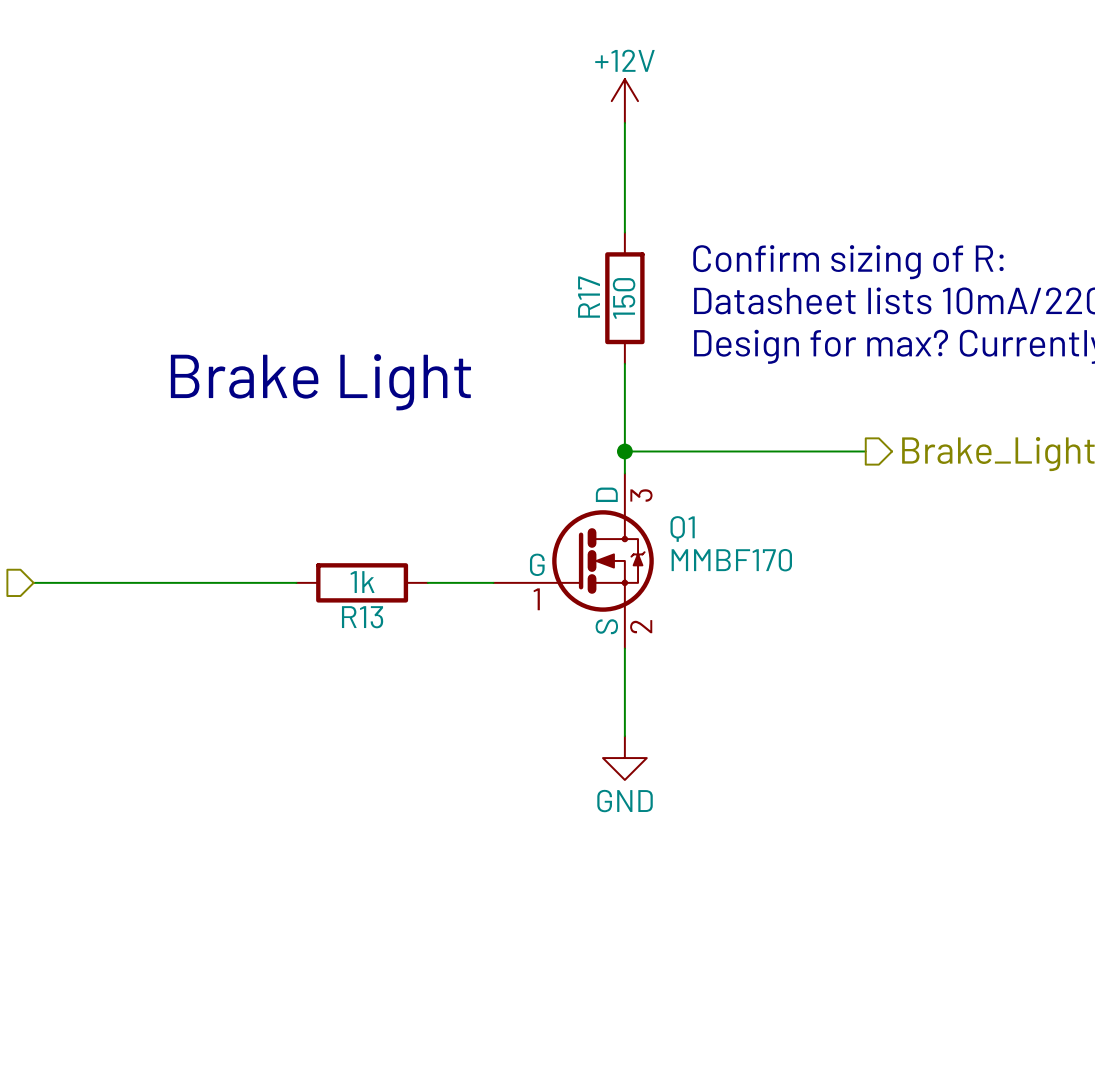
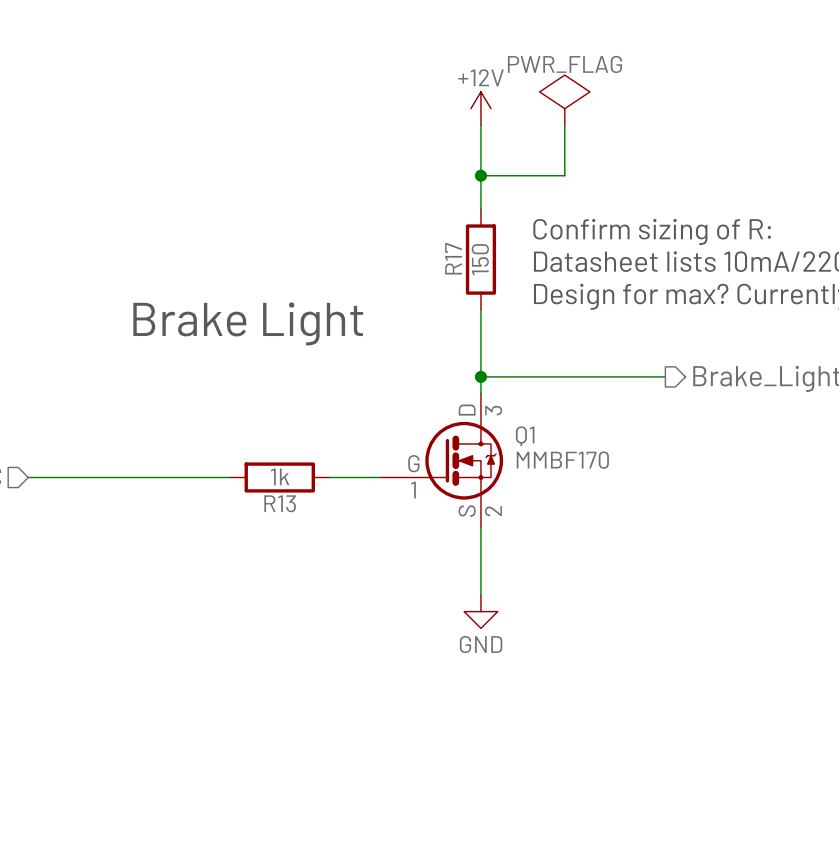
power symbol: none -> PWR_FLAG (564, 100)
wire: none -> (564, 125) (564, 175) (480, 175)
junction: none -> (480, 175)

